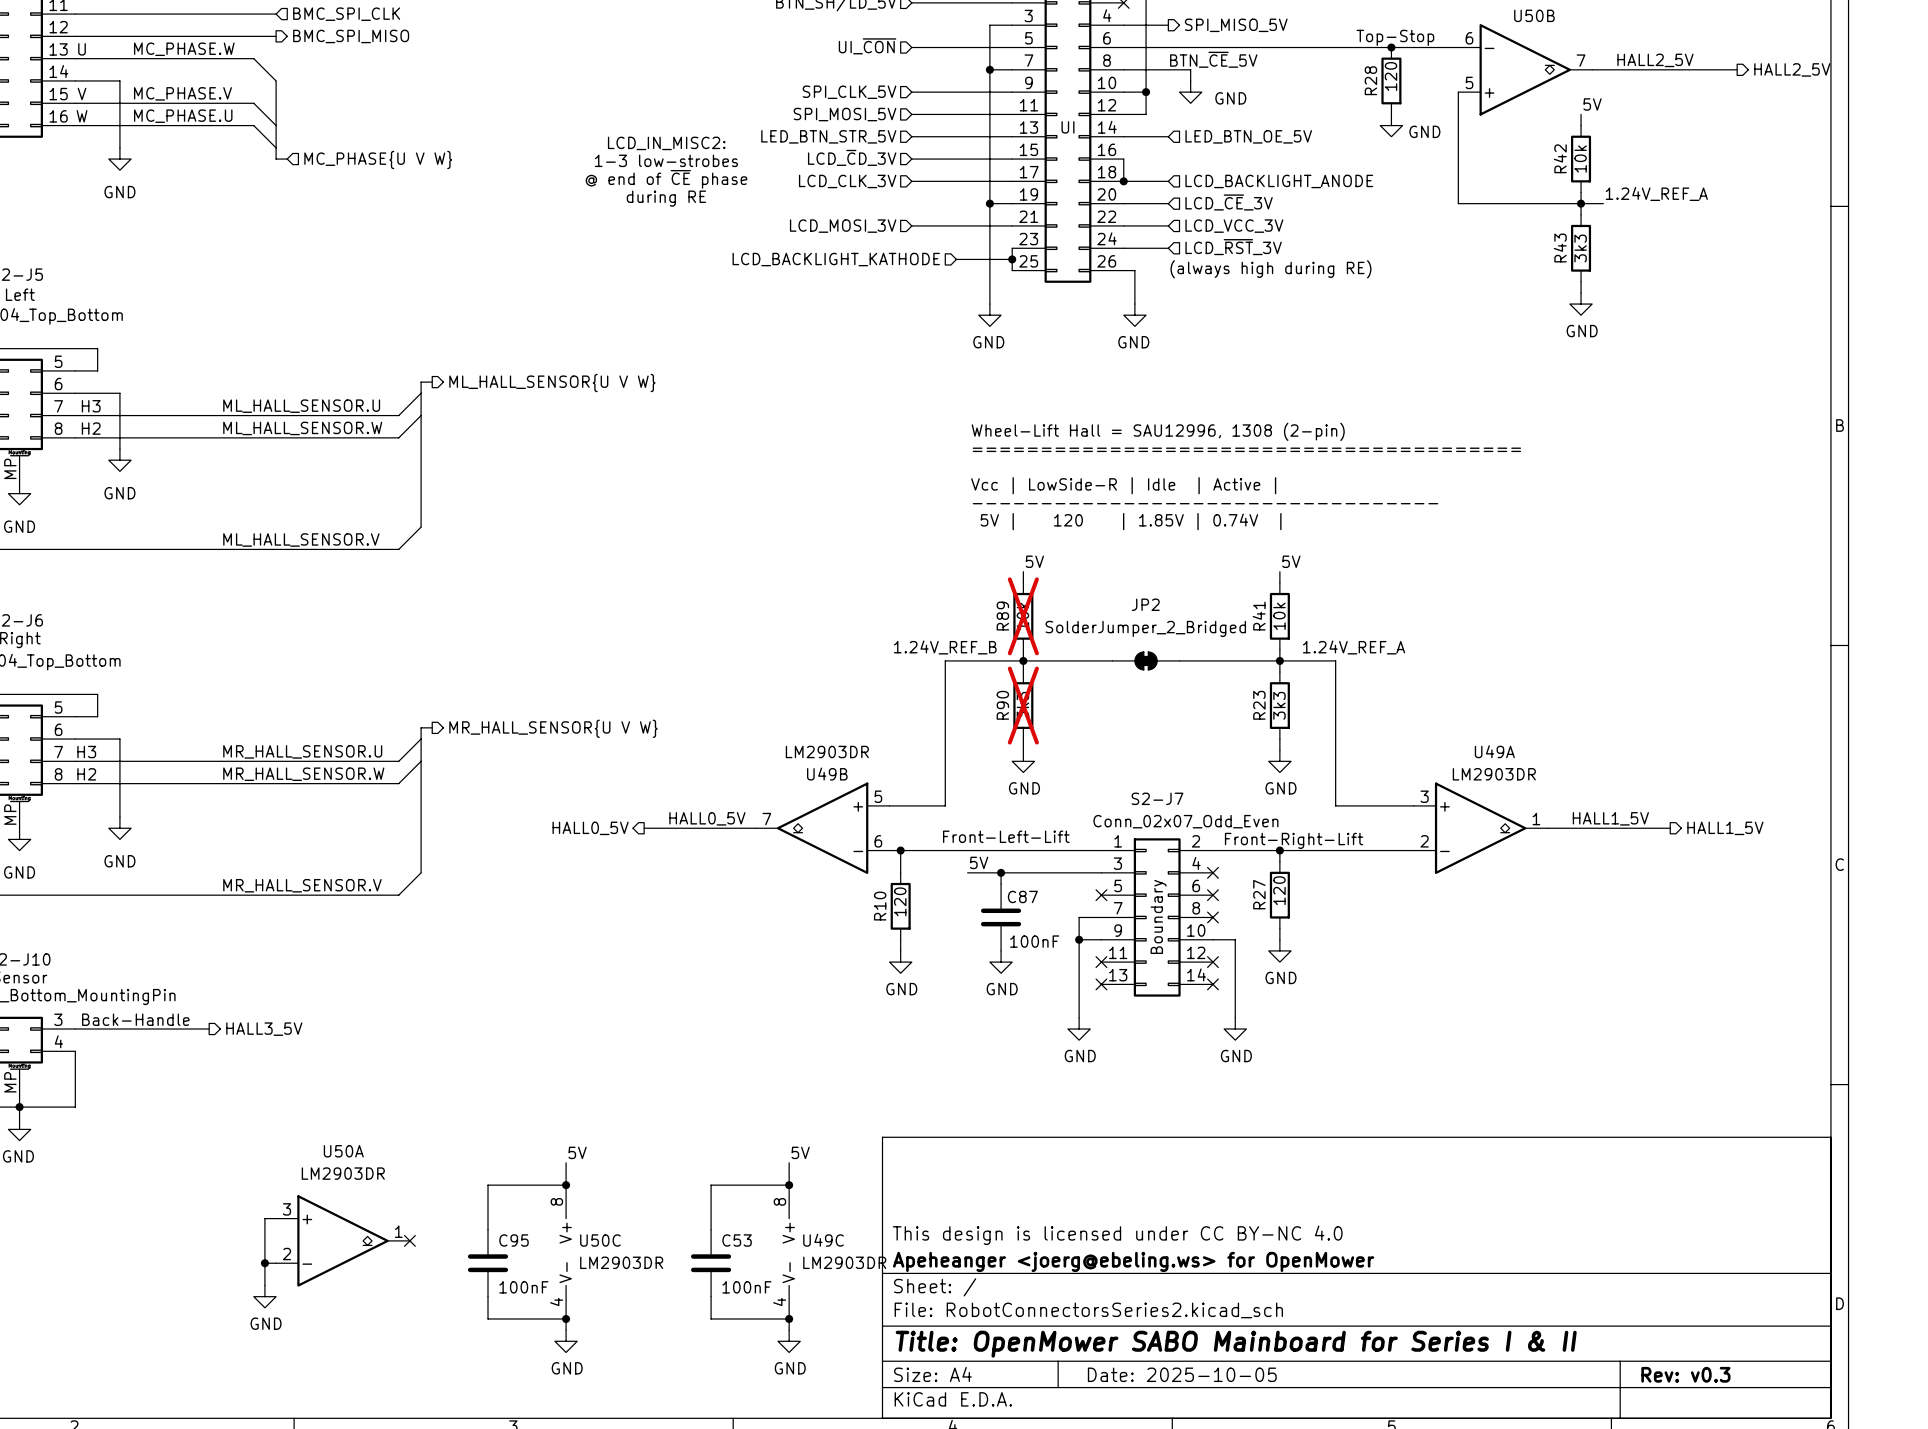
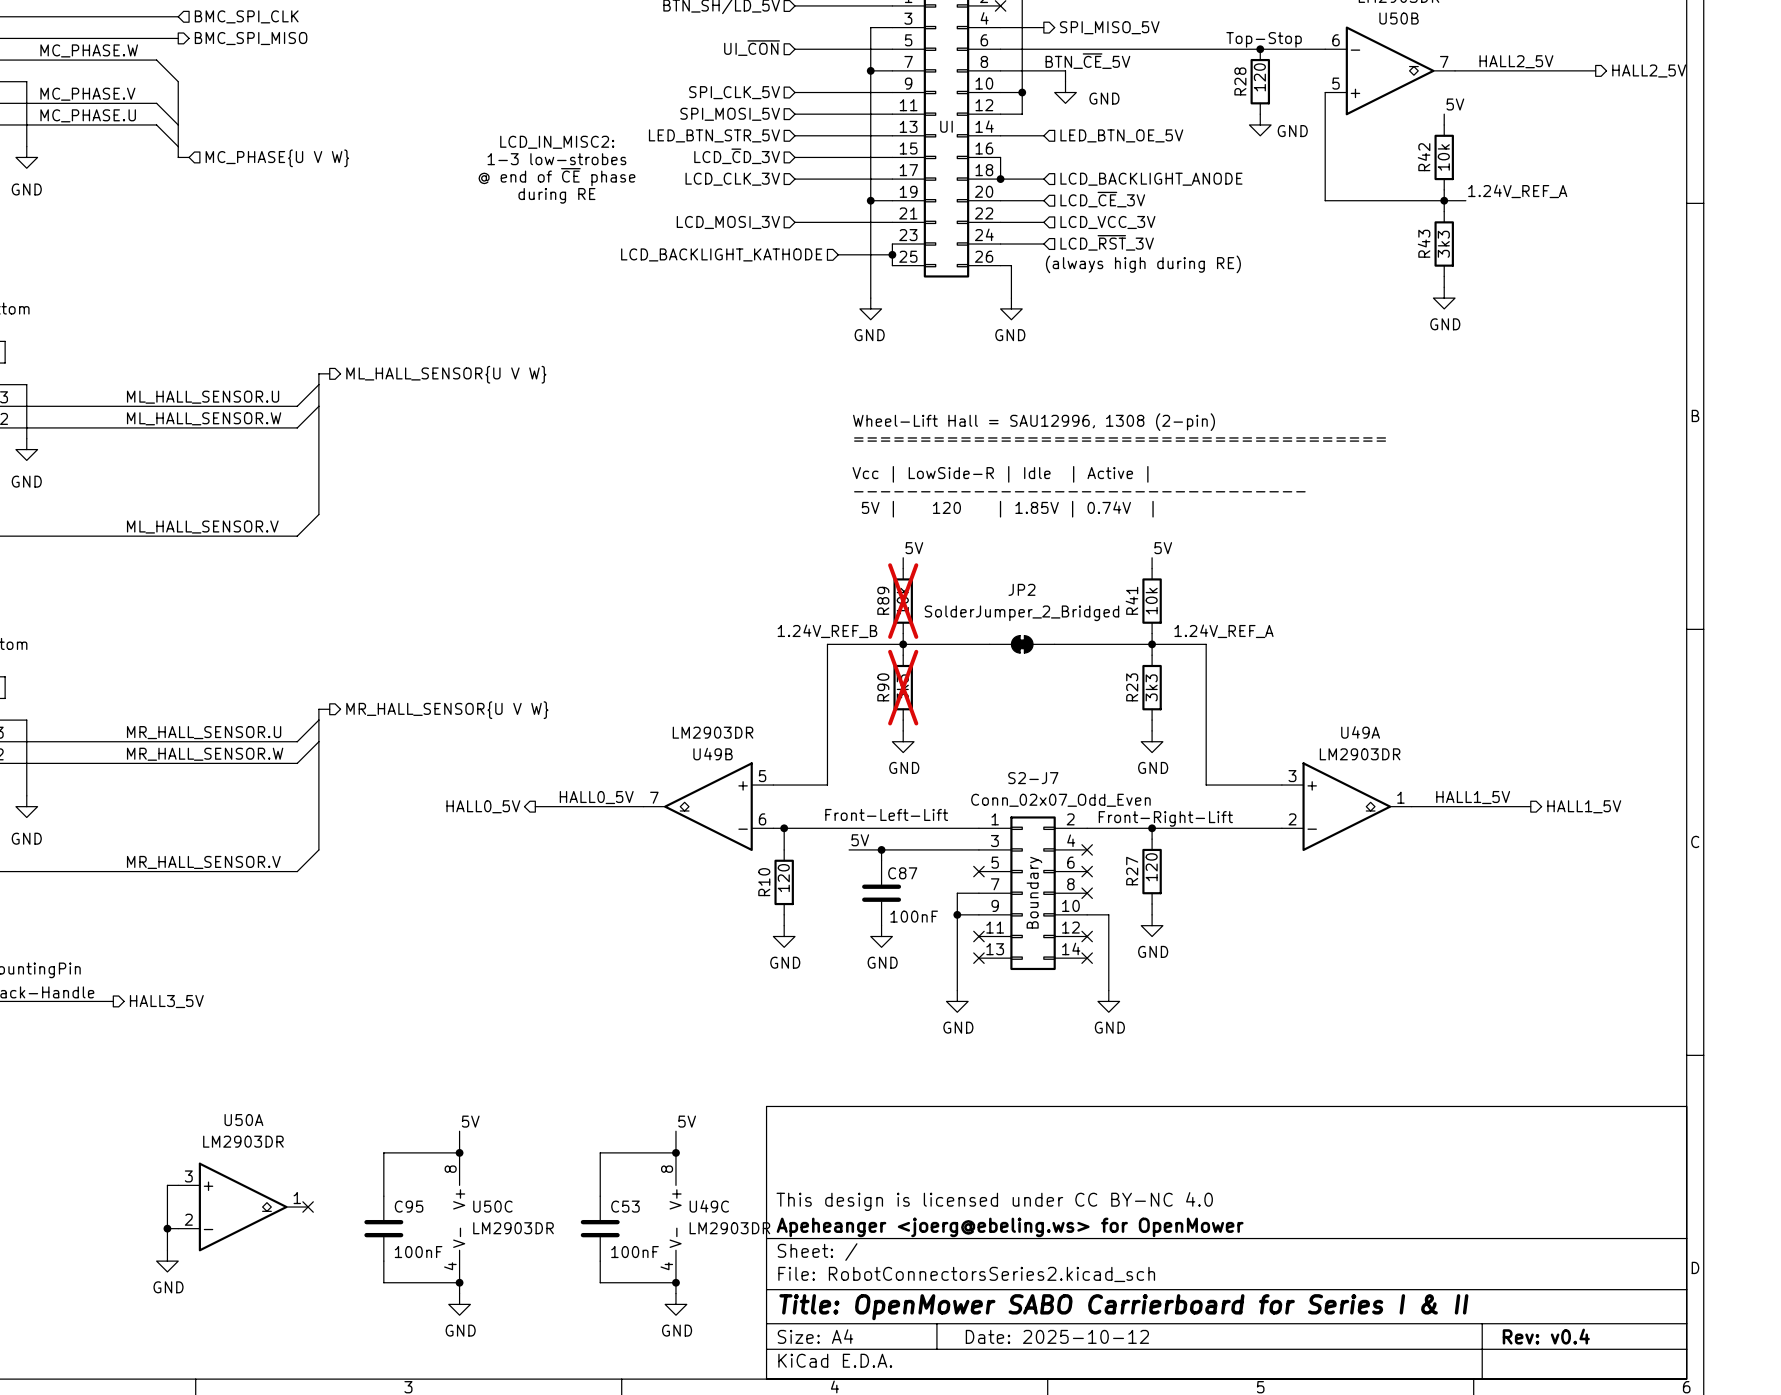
title block: Title: OpenMower SABO Mainboard for Series I & II (1236, 1344) -> Title: OpenMower SABO Carrierboard for Series I & II (1123, 1307)
title block: Date: 2025-10-05 (1182, 1374) -> Date: 2025-10-12 (1057, 1336)
title block: Rev: v0.3 (1685, 1374) -> Rev: v0.4 (1546, 1336)

